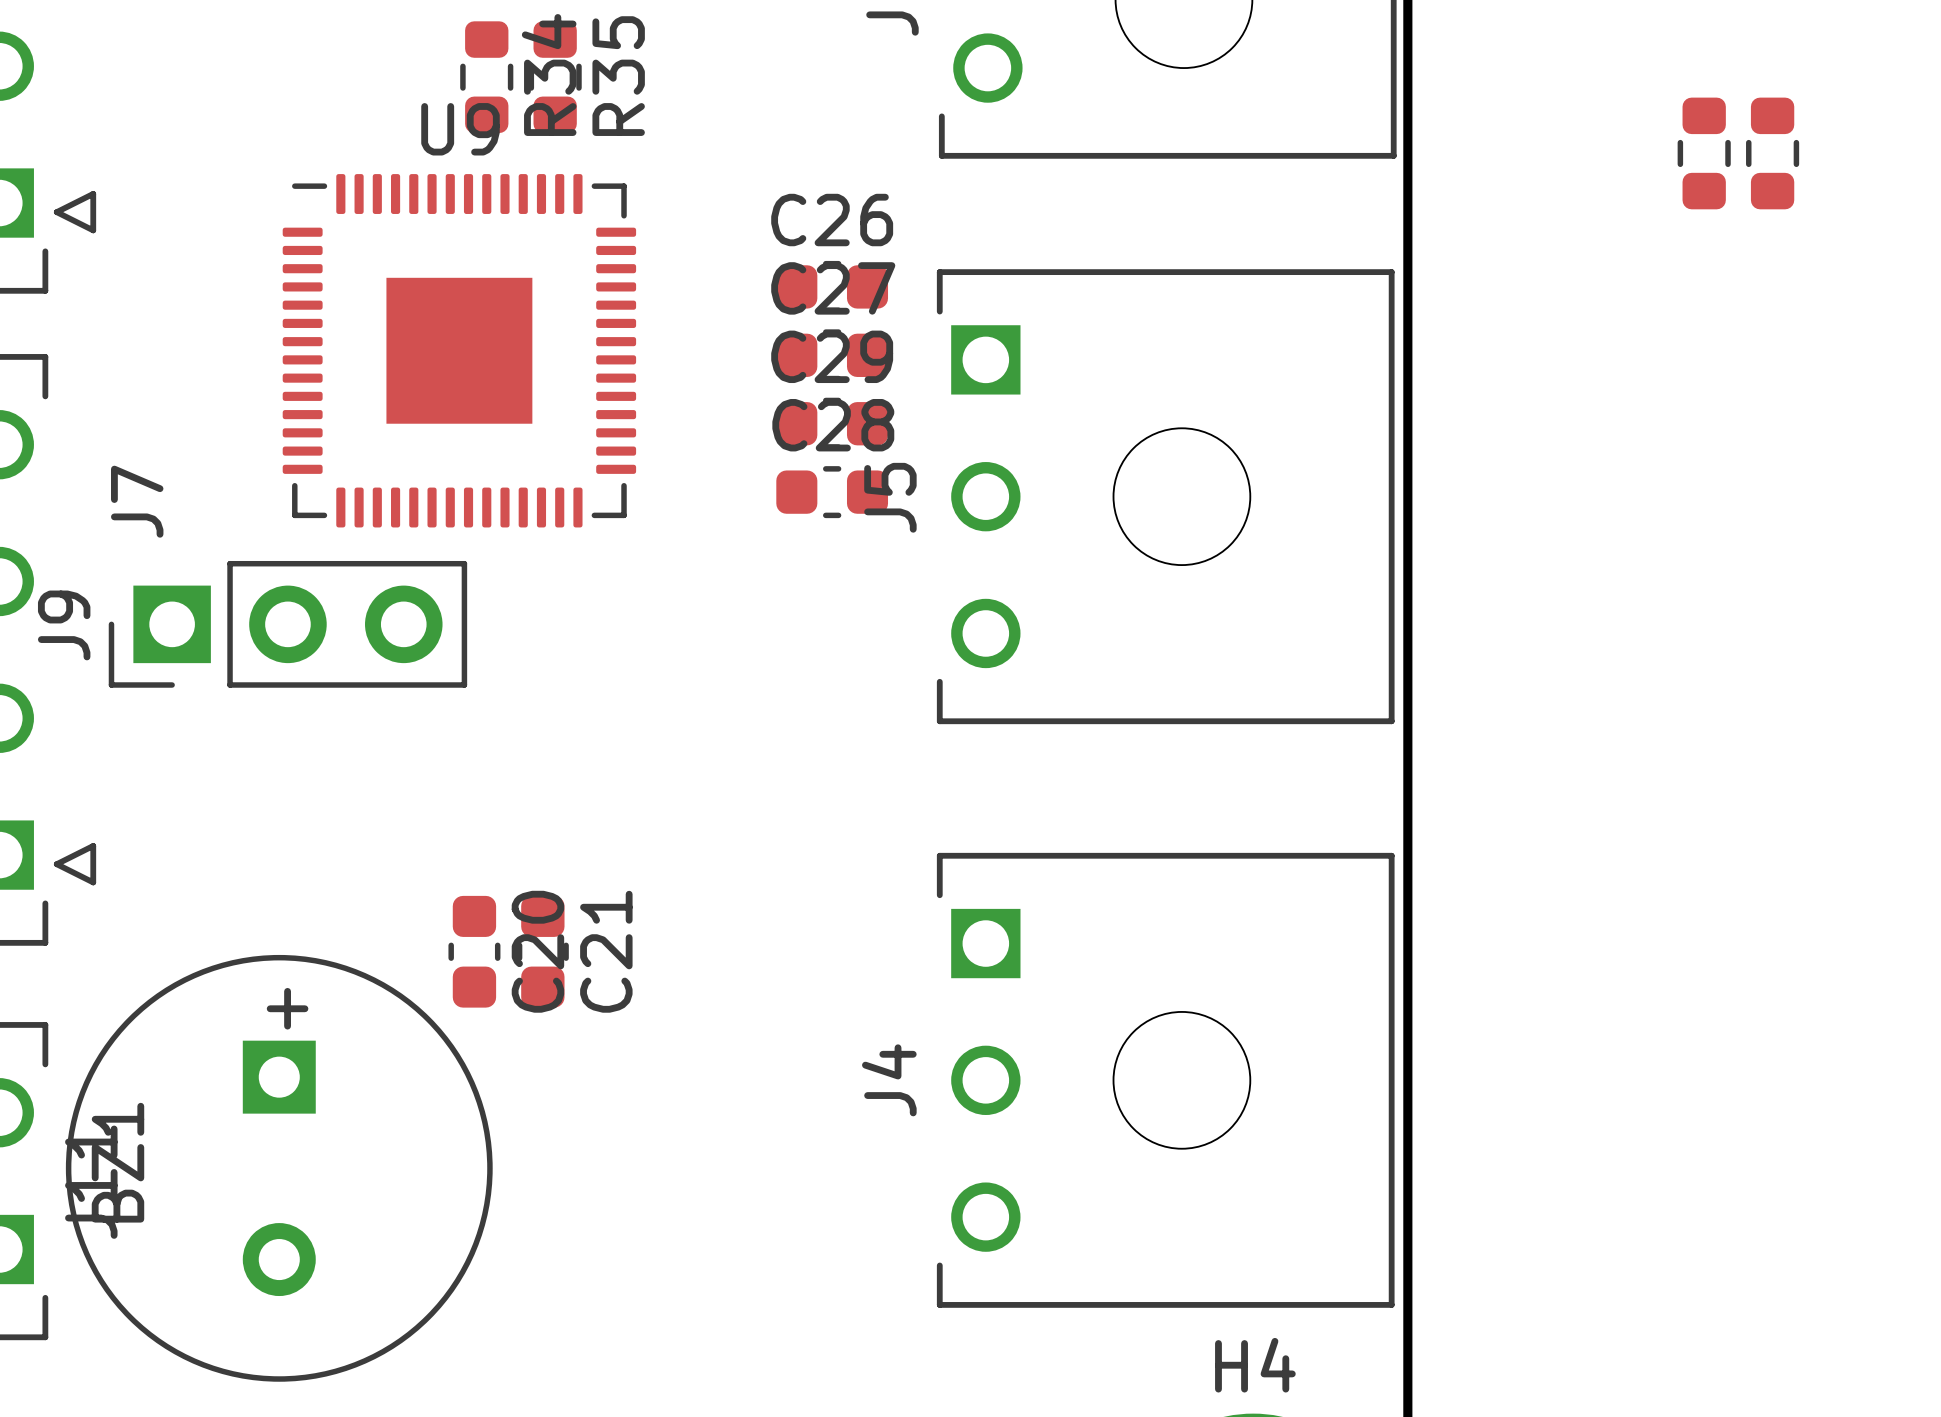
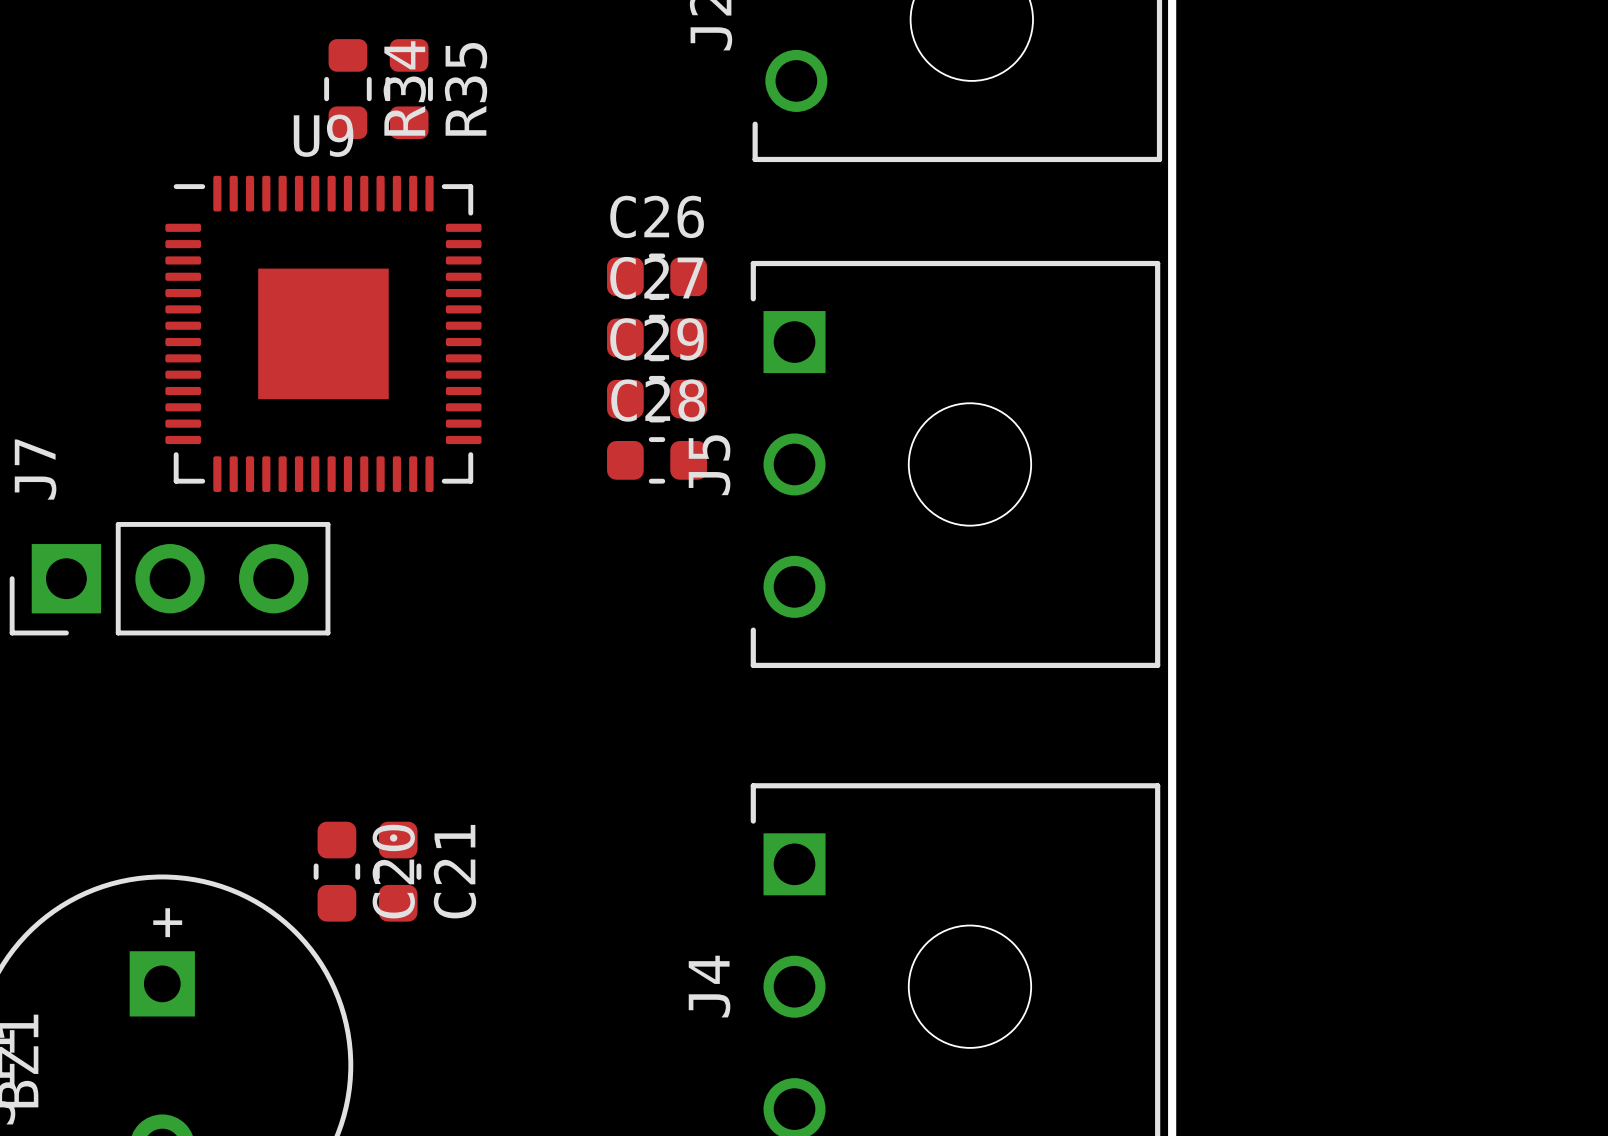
part: (1704, 153) -> none
part: (1772, 153) -> none

